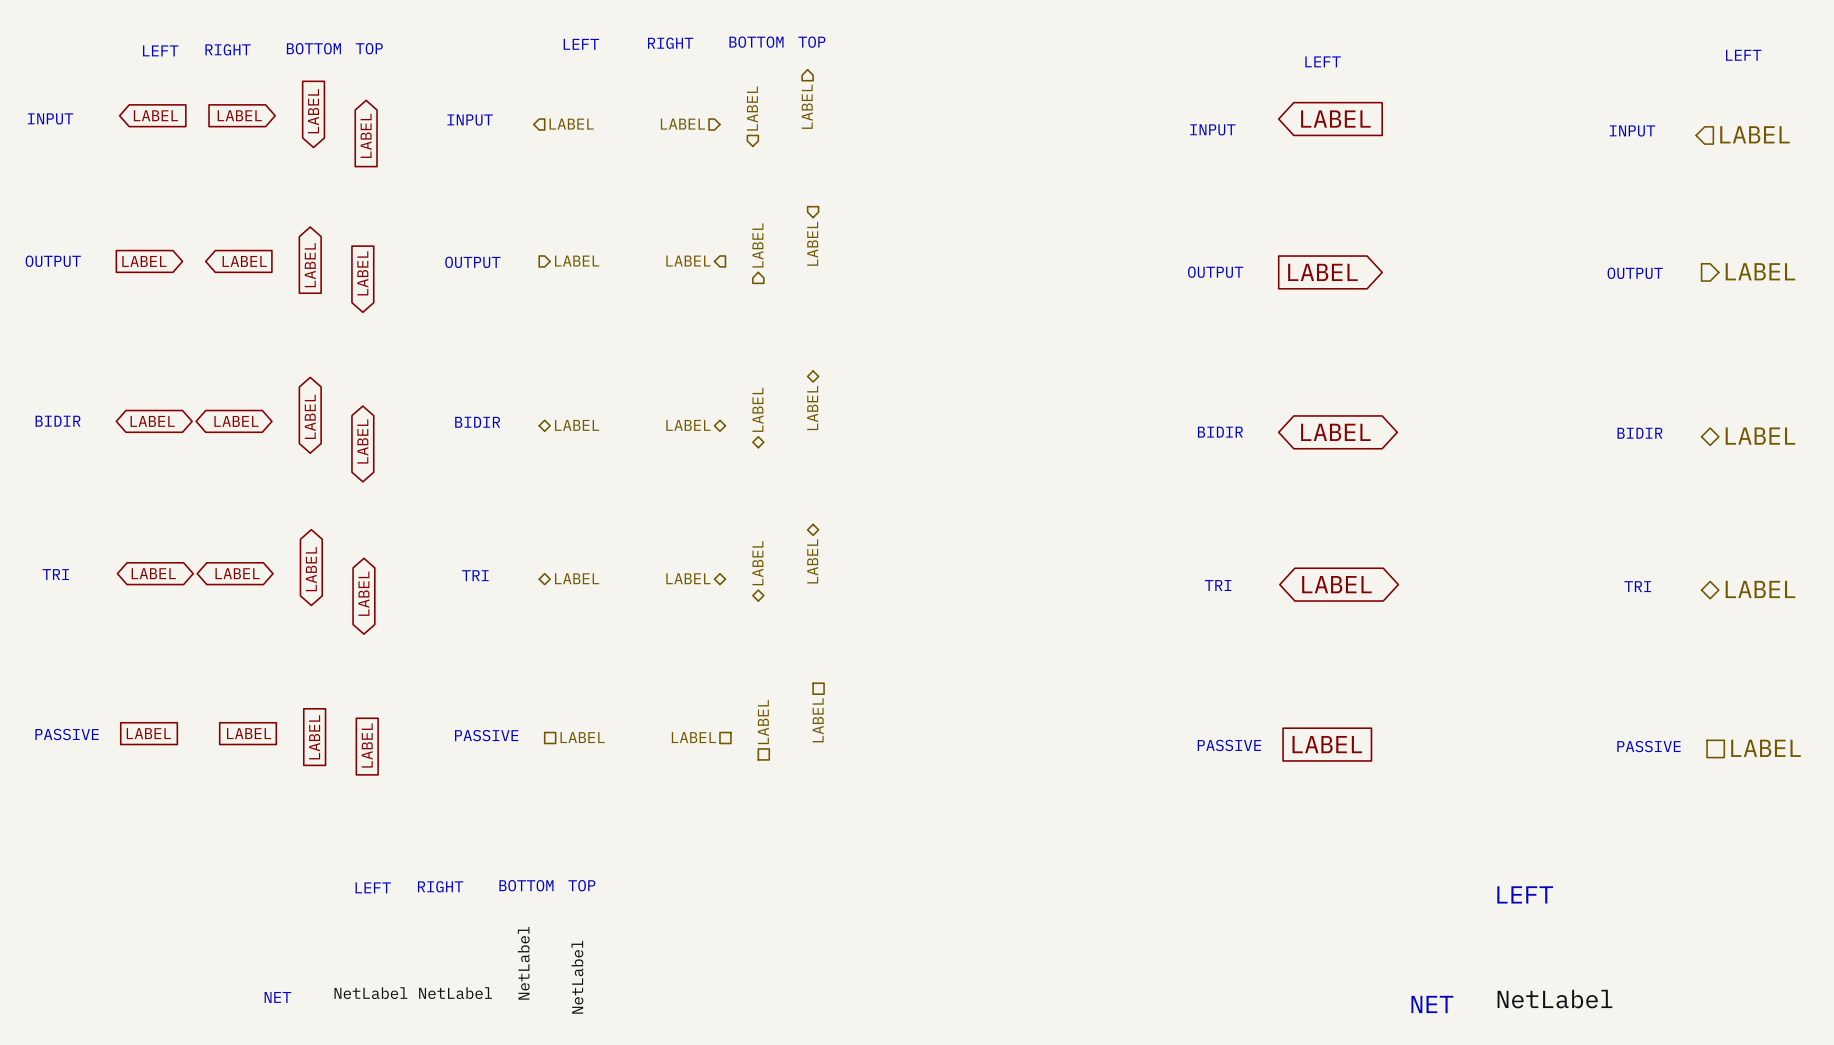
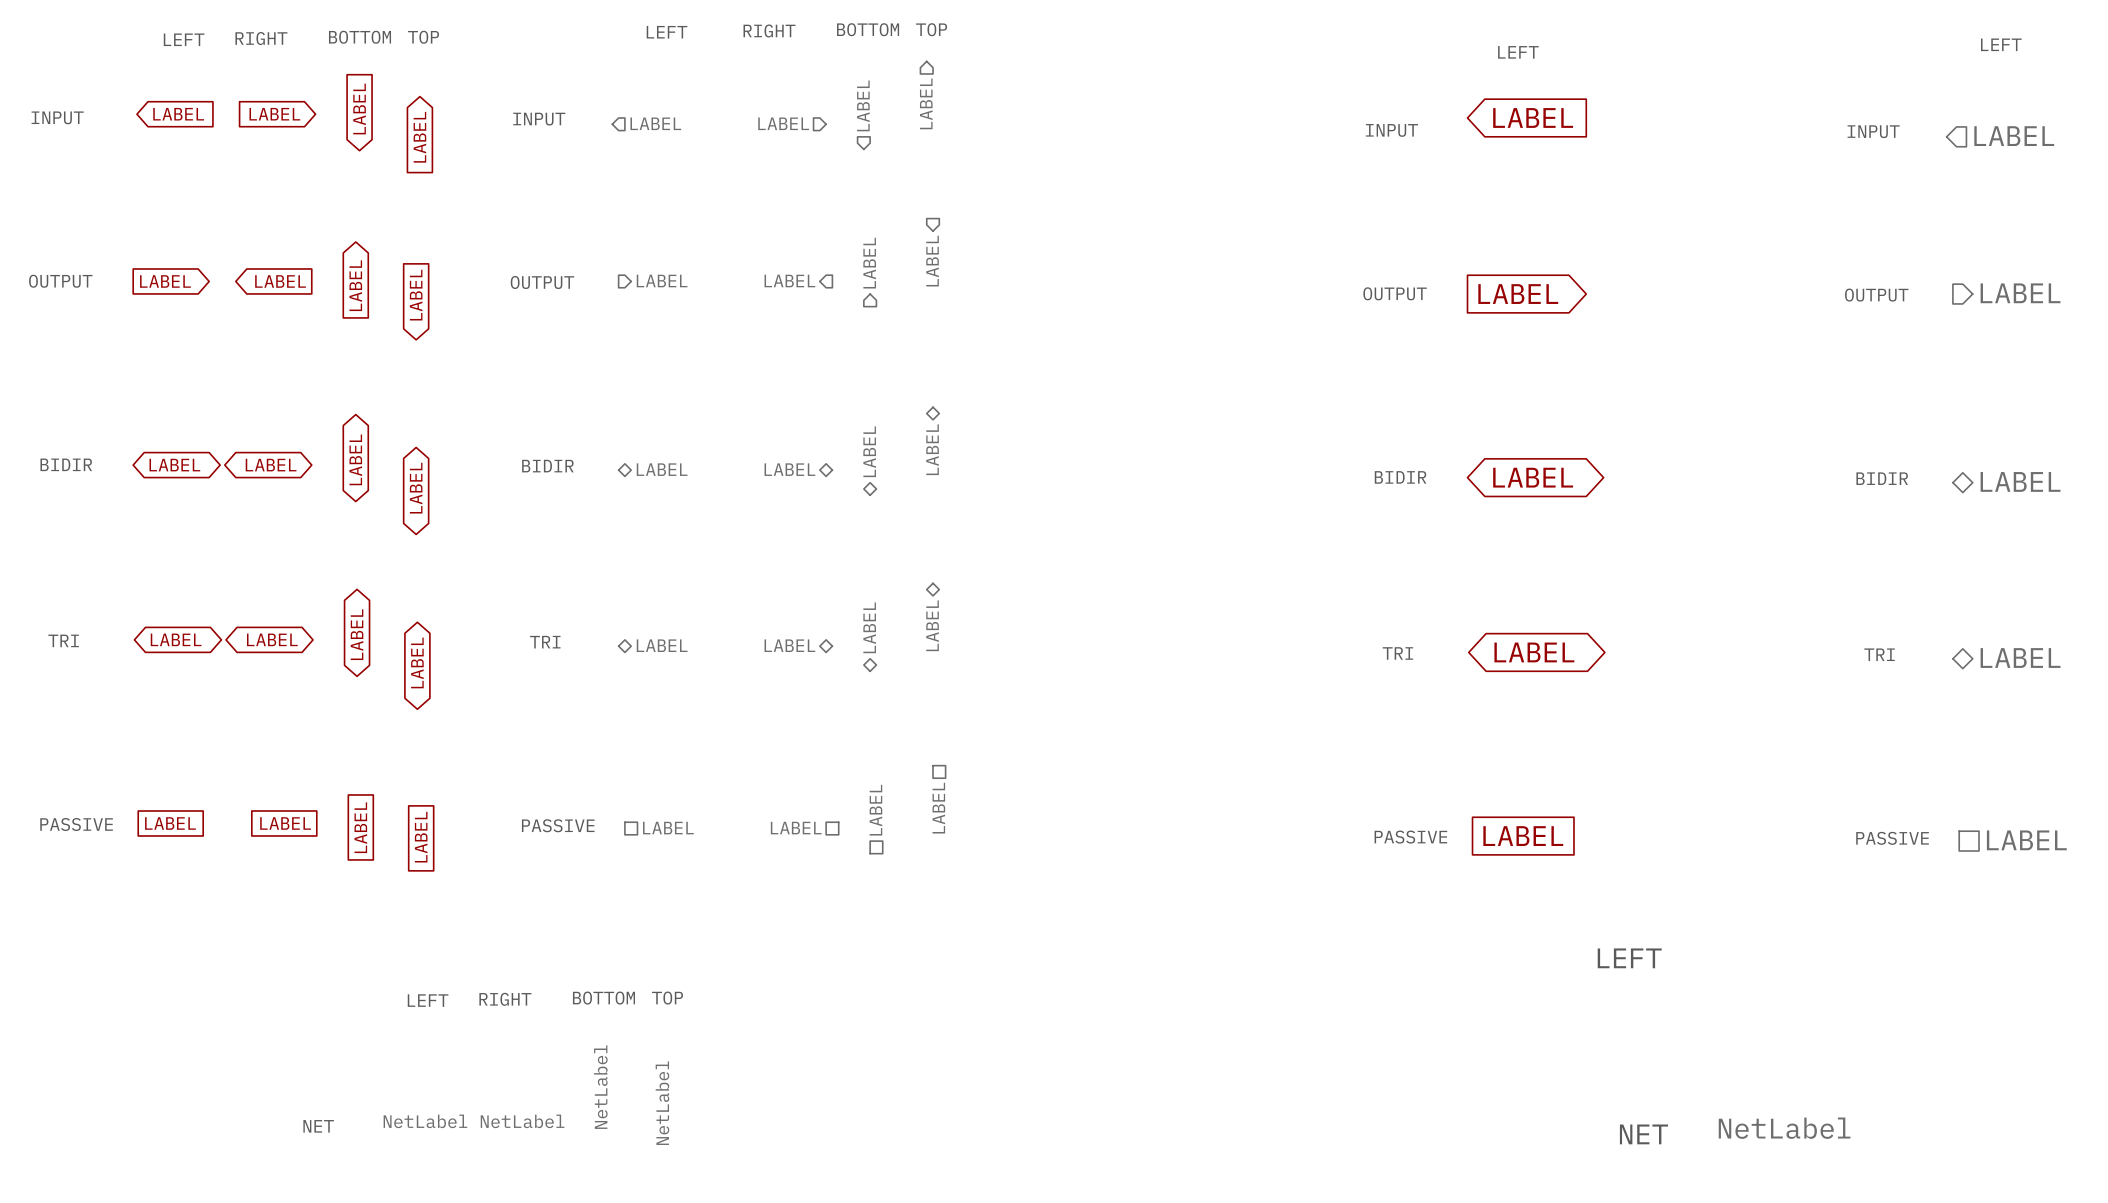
text position: LEFT (1525, 894) -> LEFT (1629, 958)

